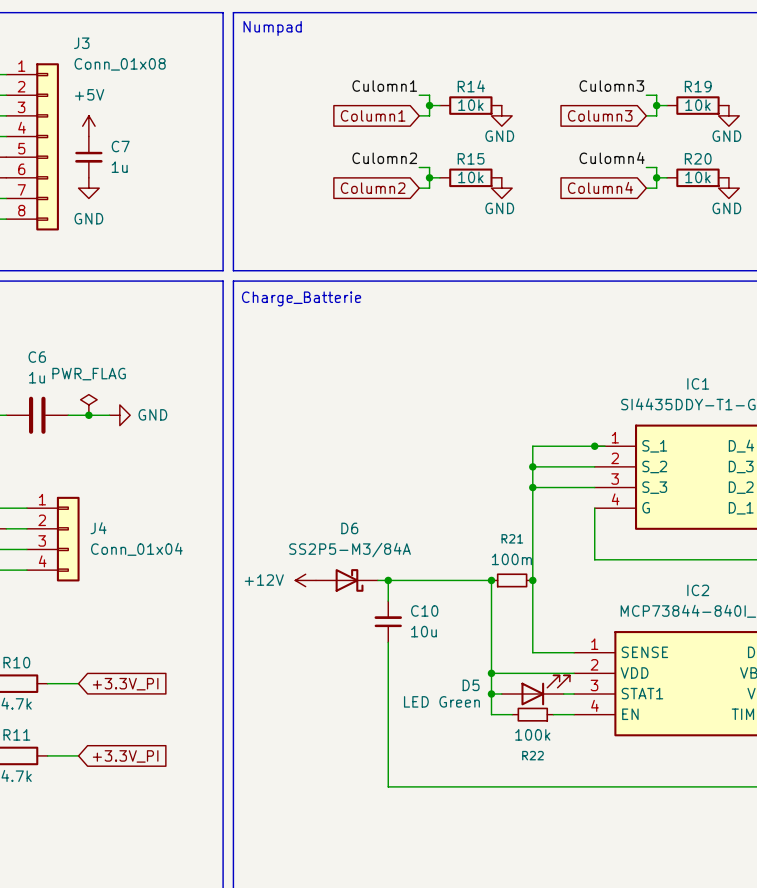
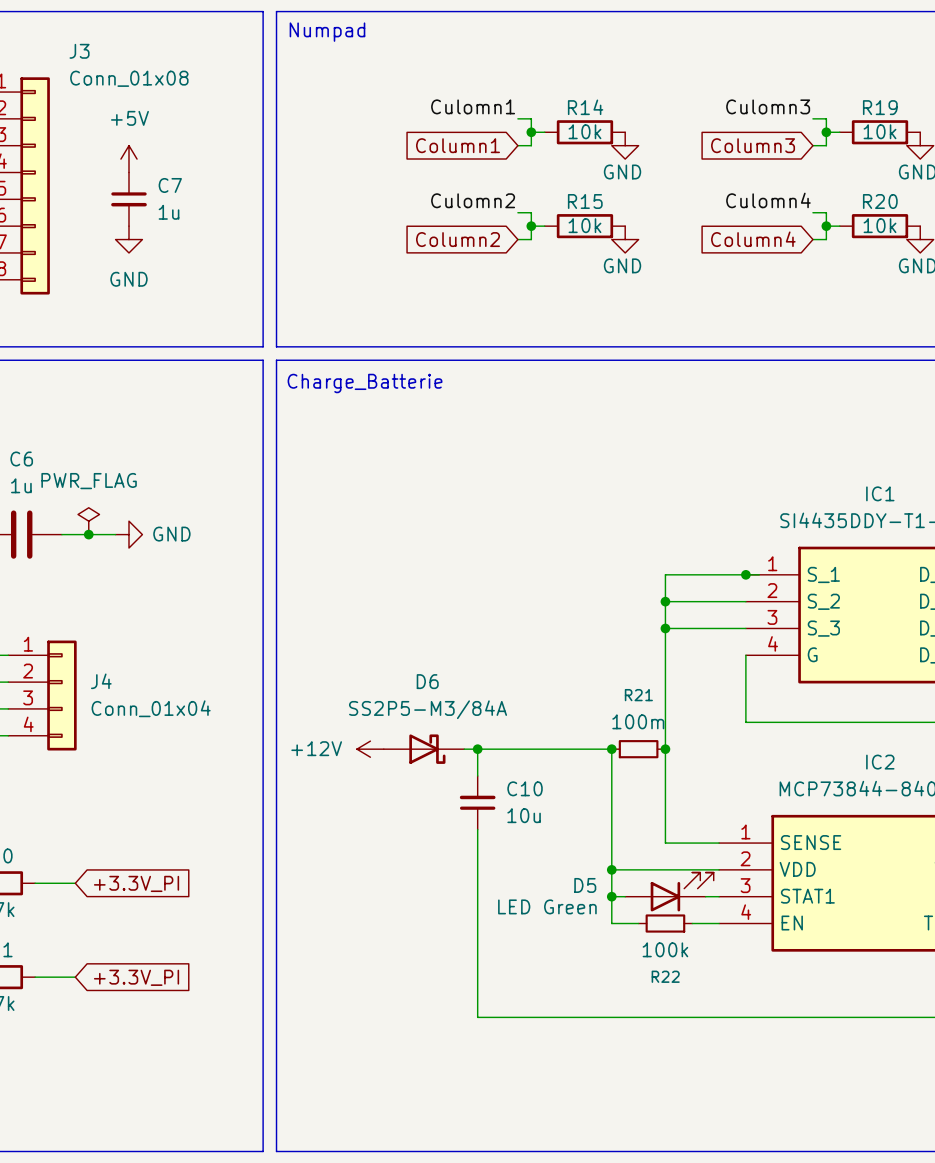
power symbol position: +5V (88, 126) -> +5V (128, 159)
C7 position: (88, 157) -> (128, 199)
power symbol position: GND (88, 188) -> GND (128, 239)

